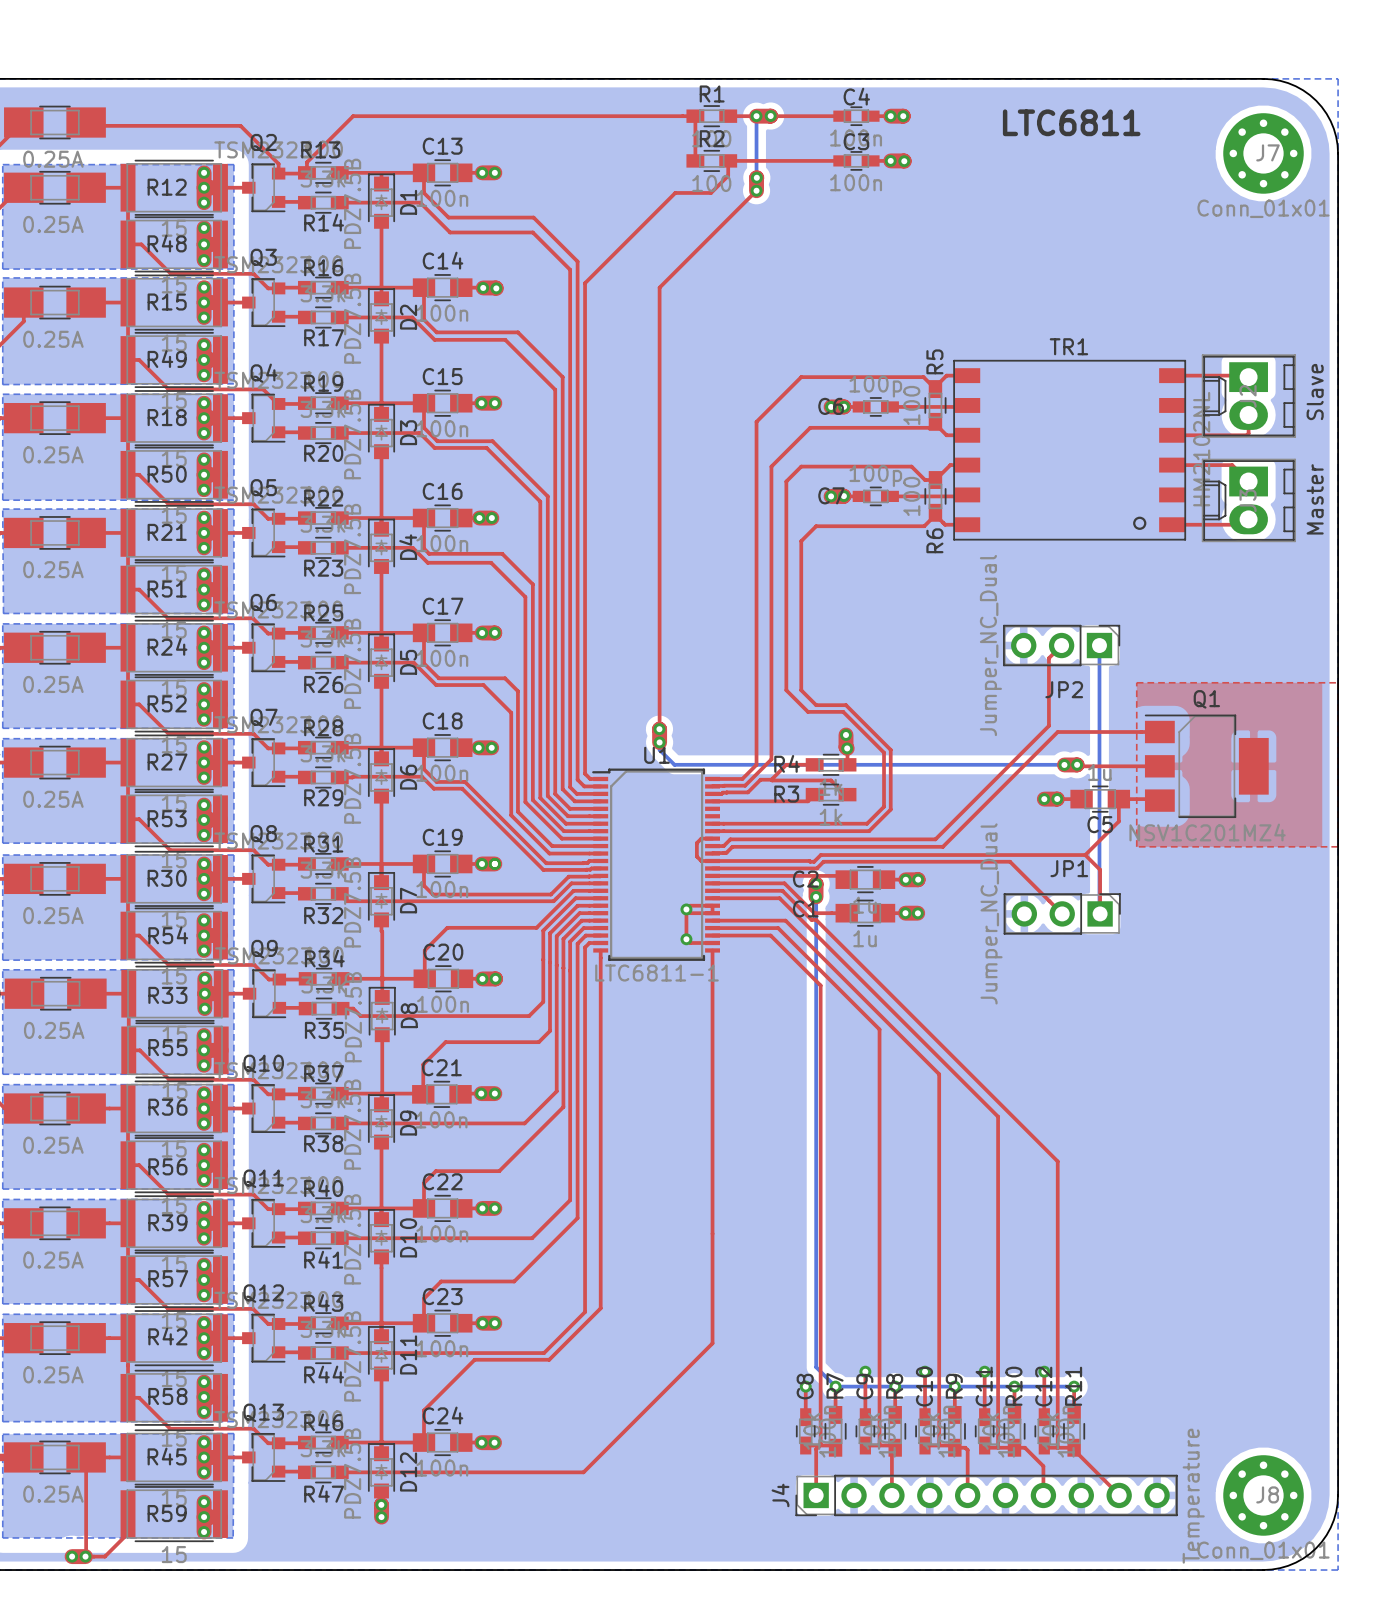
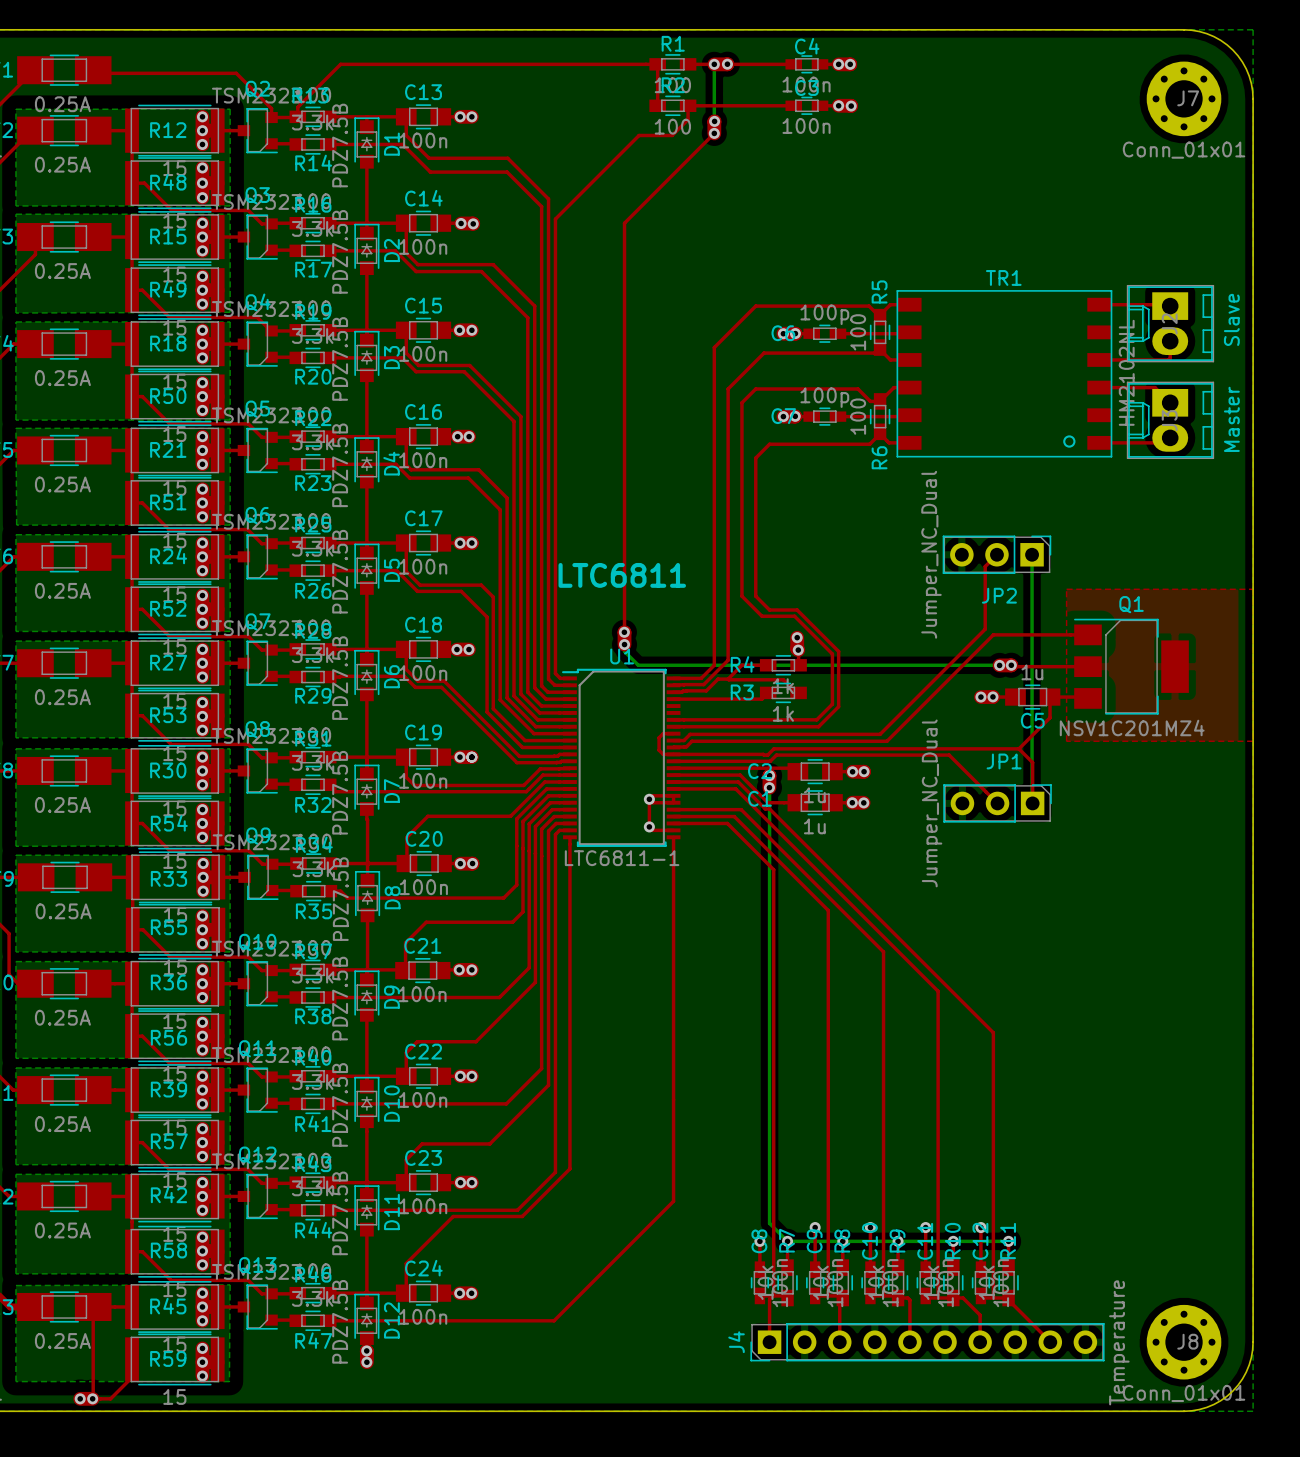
text: LTC6811 (1071, 122) -> none
text: none -> LTC6811 (622, 575)

